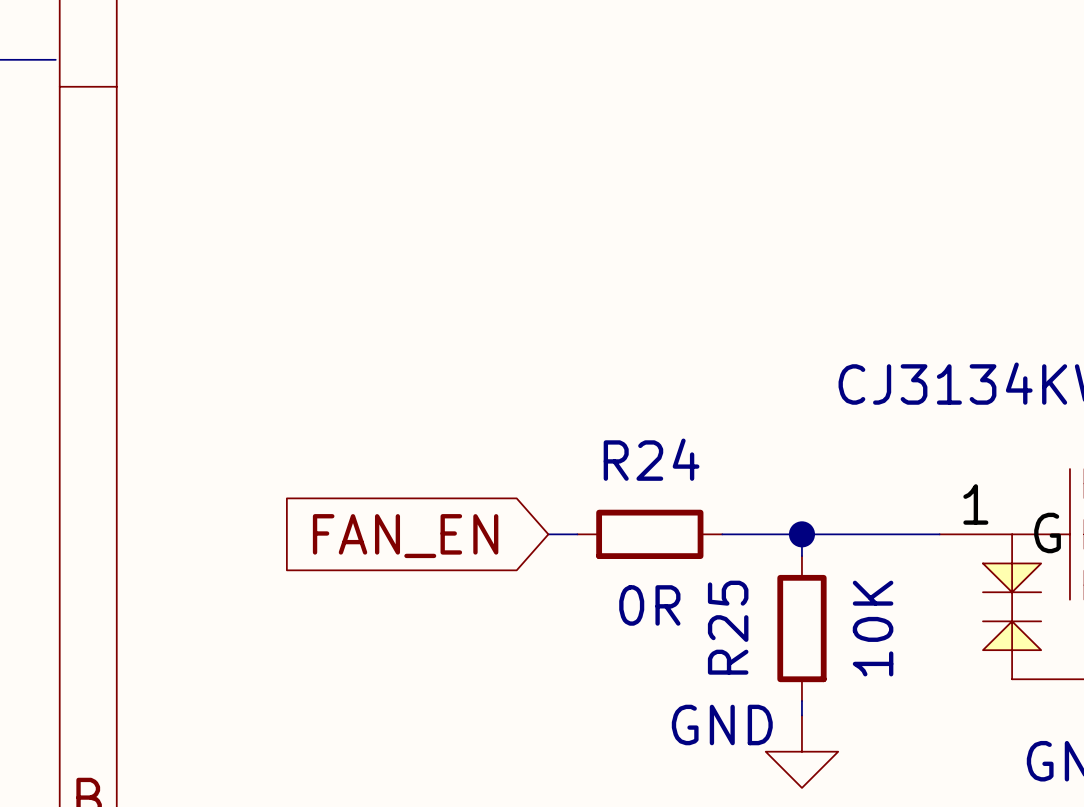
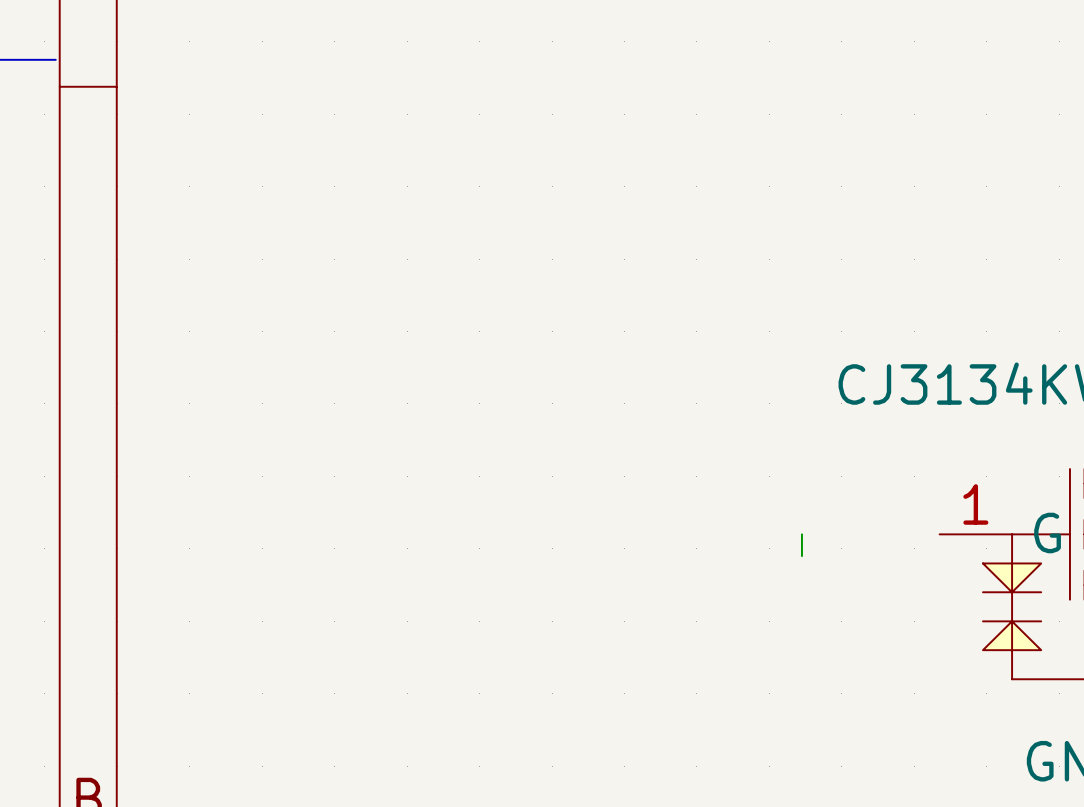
wire: (548, 534) (577, 534) -> none
R24: 0R (649, 534) -> none
wire: (722, 534) (939, 534) -> none
junction: (801, 534) -> none
global label: FAN_EN (405, 536) -> none
R25: 10K (801, 628) -> none
wire: (801, 700) (801, 715) -> none
power symbol: GND (801, 751) -> none

